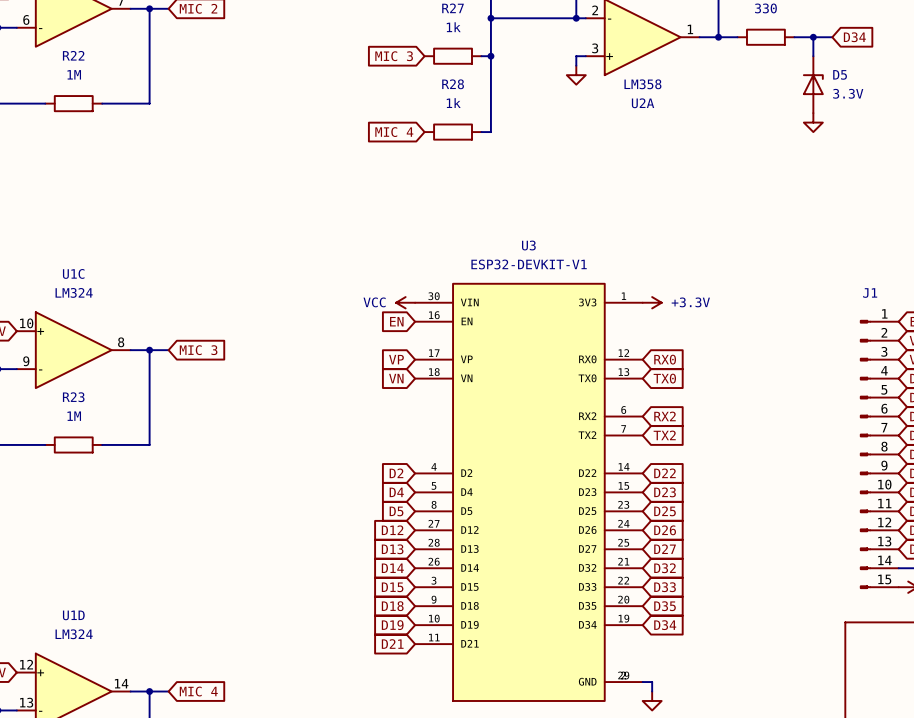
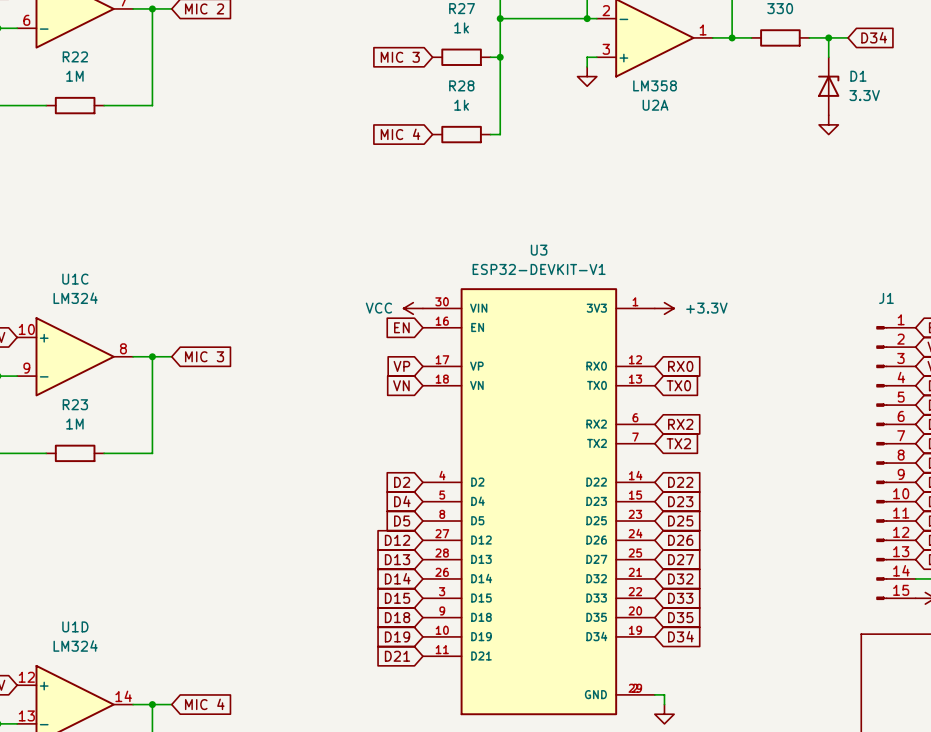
D5 name: D5 (840, 74) -> D1 (858, 76)

